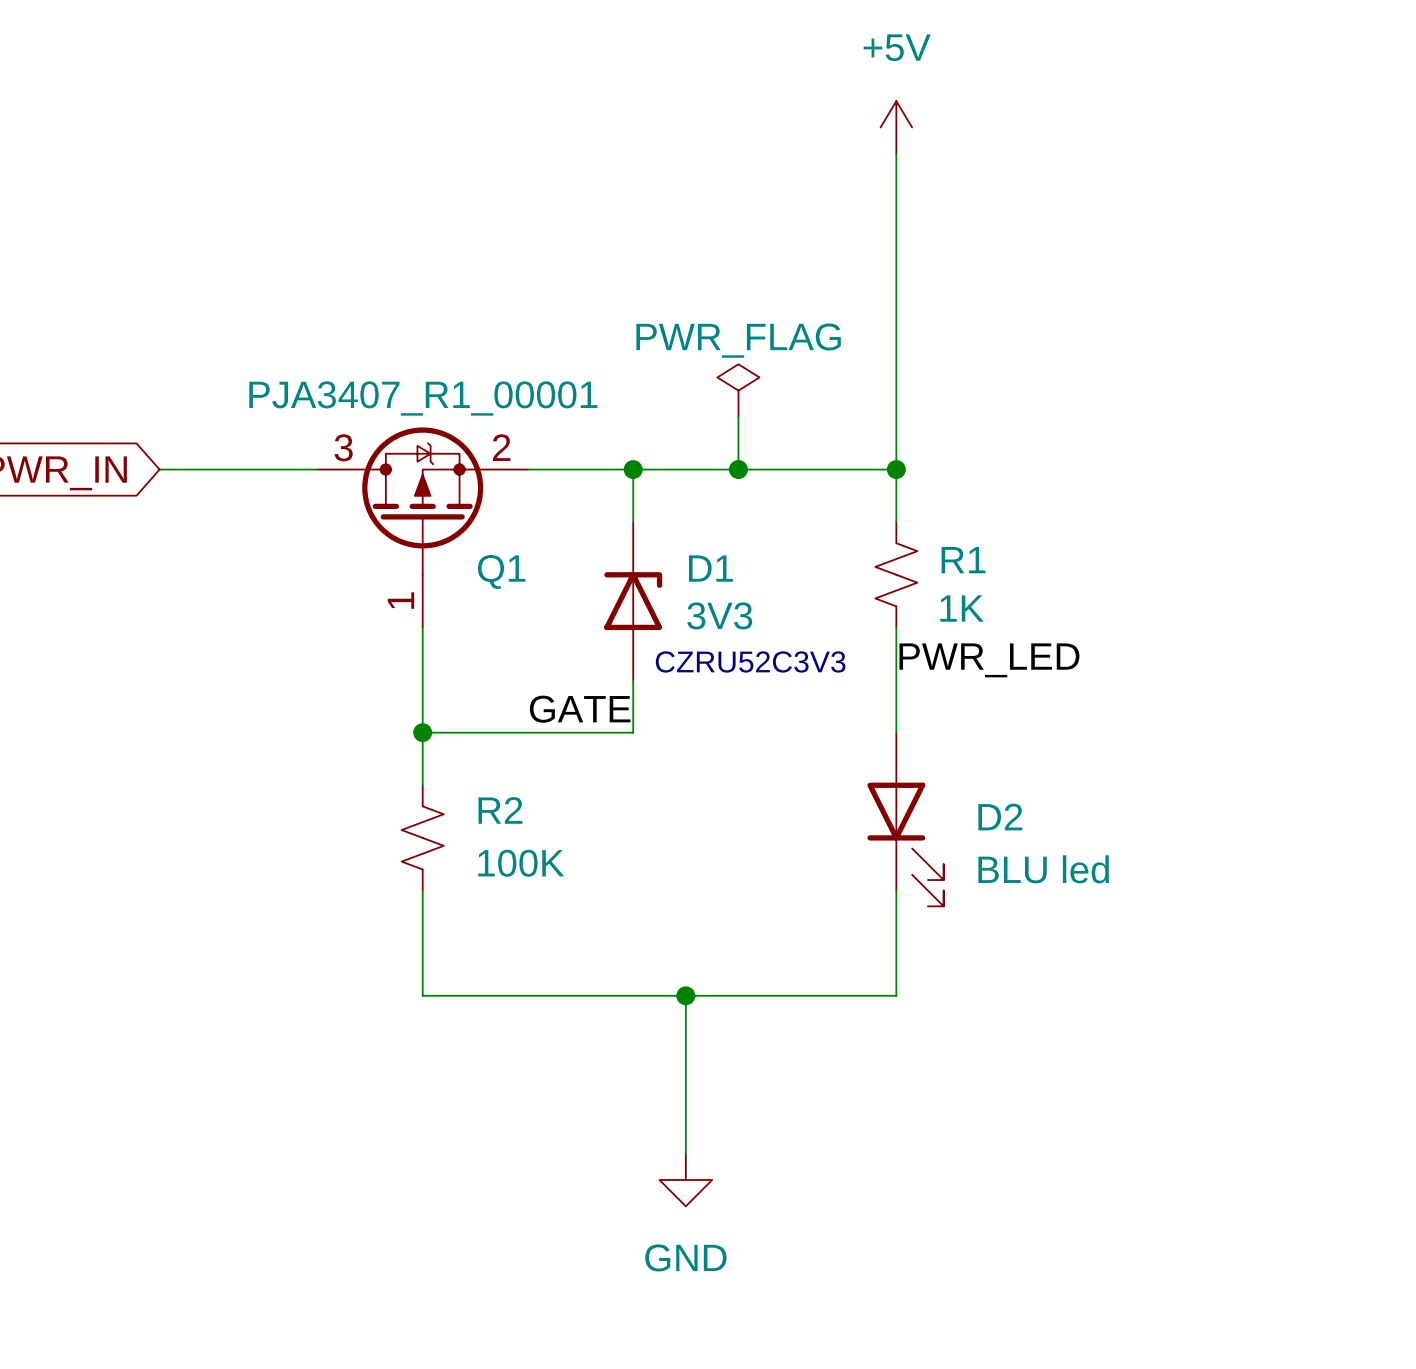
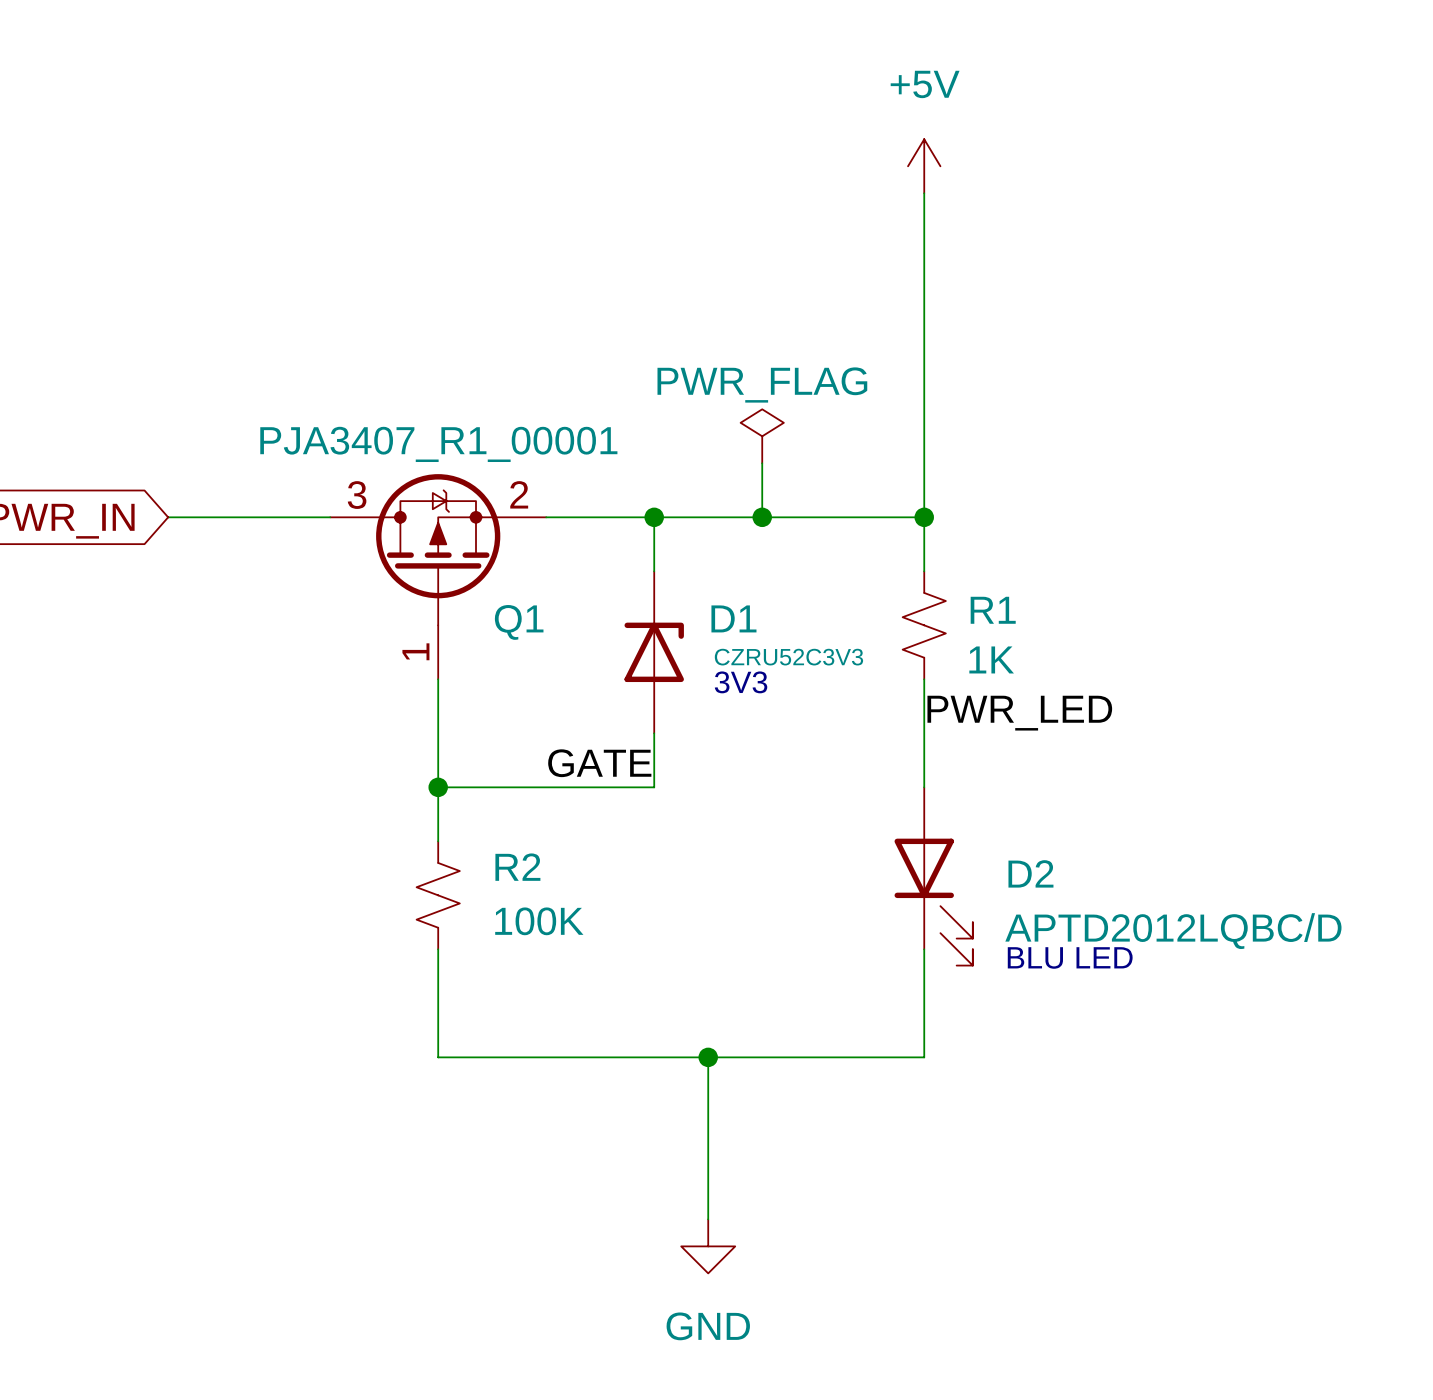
D1 value: 3V3 (719, 615) -> CZRU52C3V3 (788, 657)
text: none -> 3V3 (741, 682)
text: CZRU52C3V3 (750, 661) -> none
D2 value: BLU led (1043, 869) -> APTD2012LQBC/D (1173, 931)
text: none -> BLU LED (1070, 957)

